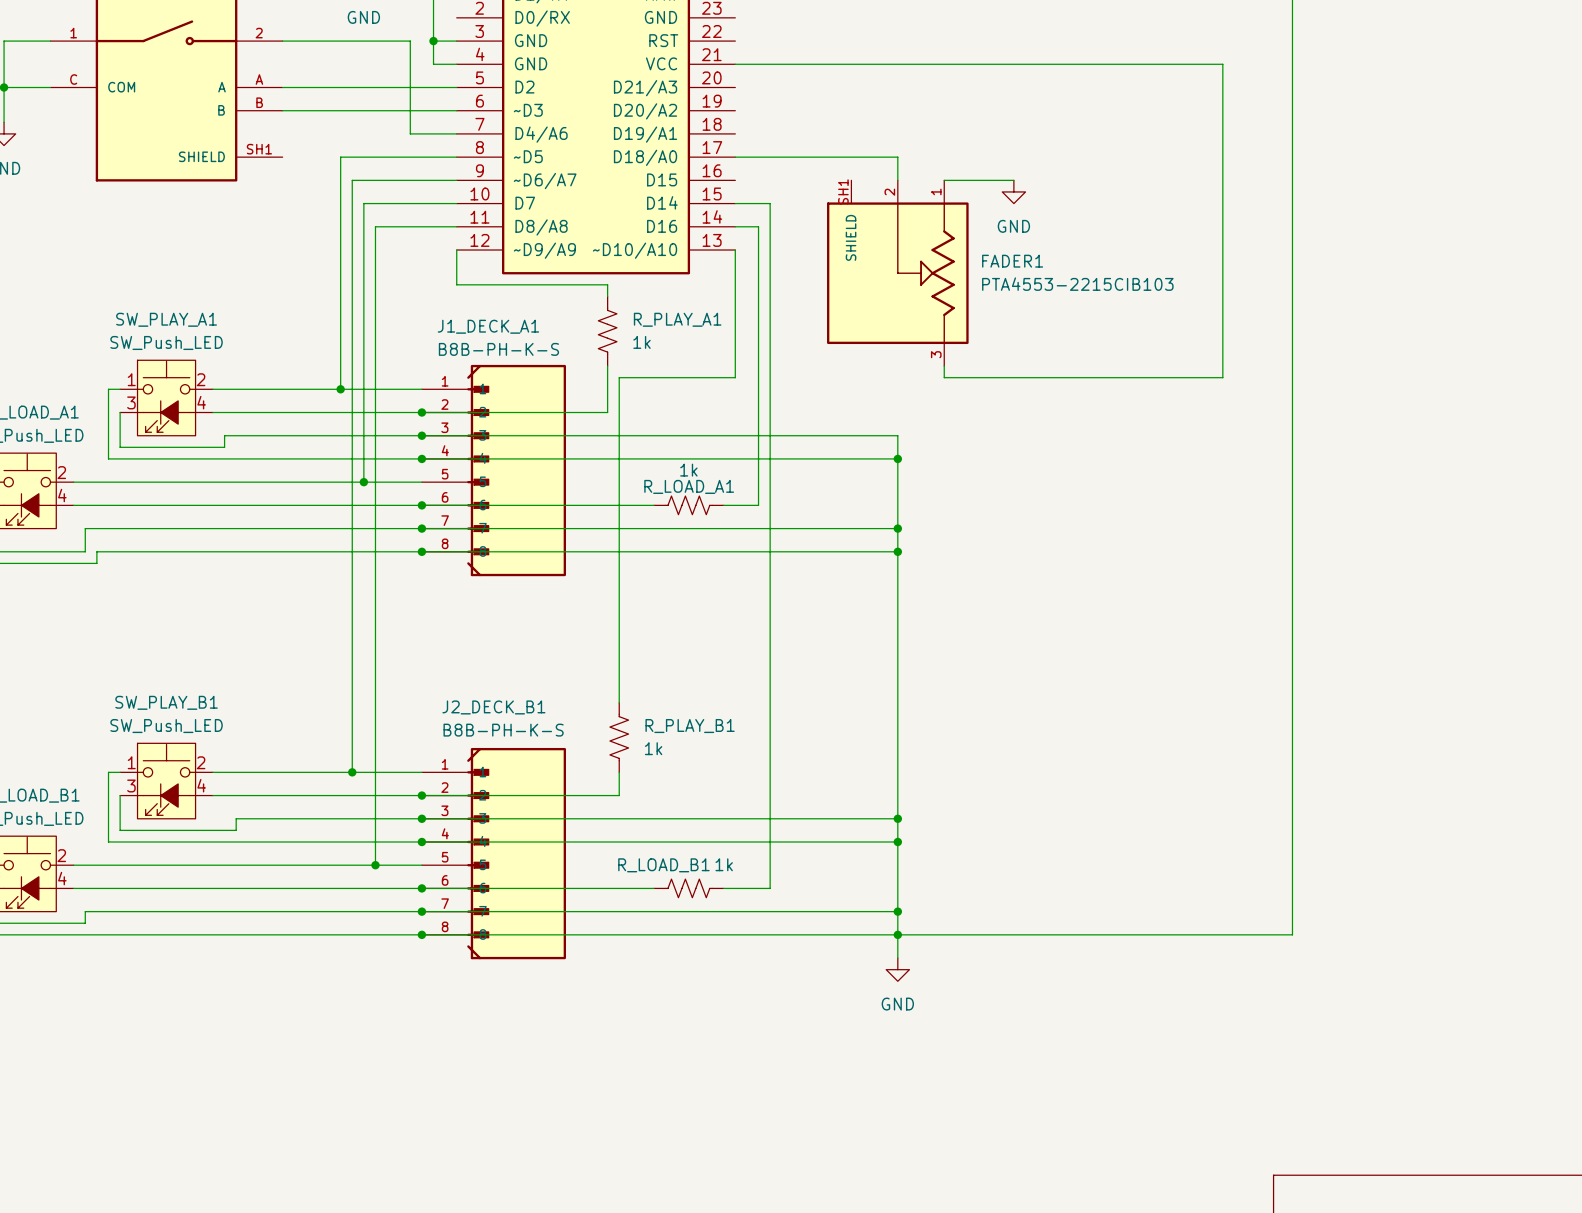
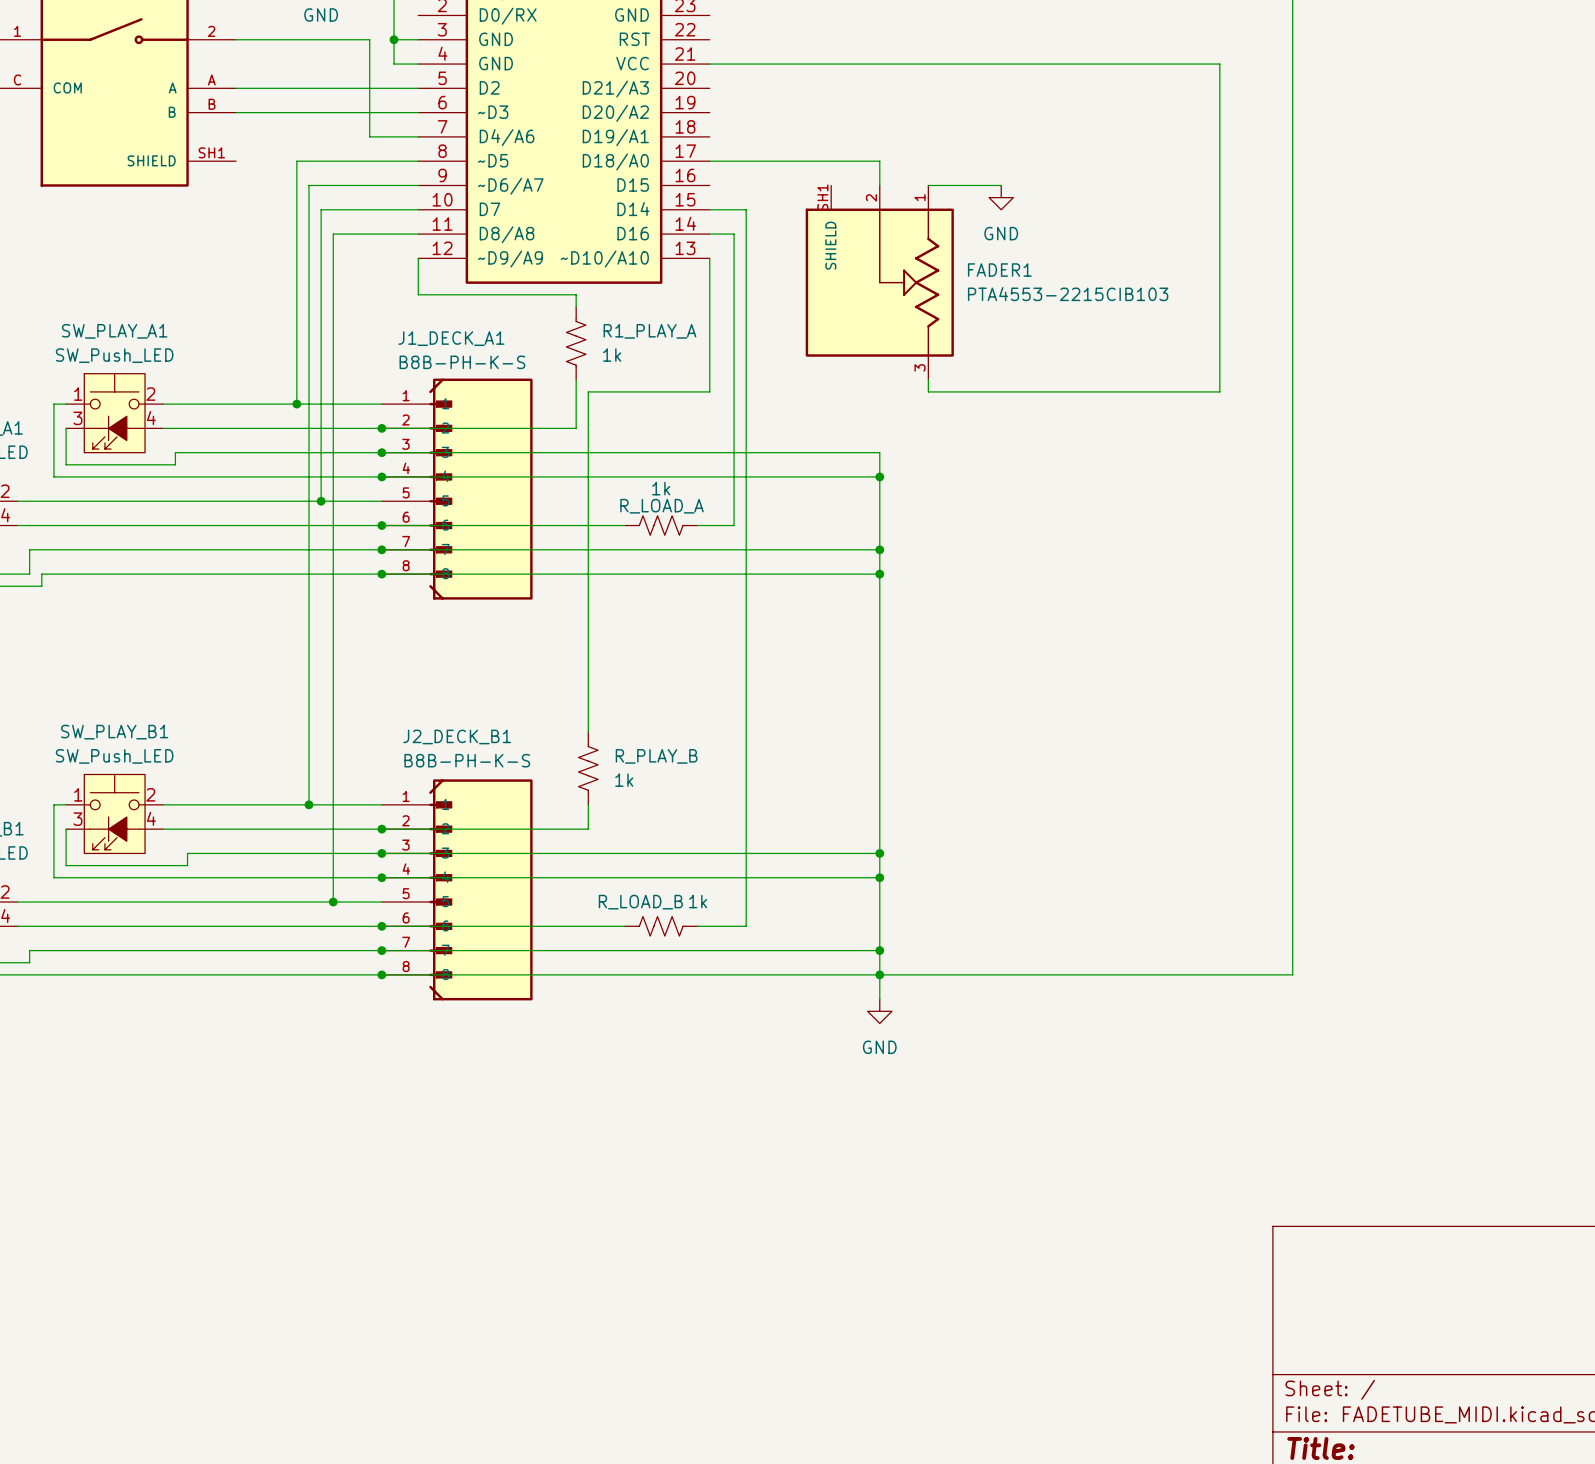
R_PLAY_A1 name: R_PLAY_A1 (677, 319) -> R1_PLAY_A (649, 331)
R_LOAD_A1 name: R_LOAD_A1 (689, 486) -> R_LOAD_A (662, 506)
R_PLAY_B1 name: R_PLAY_B1 (690, 726) -> R_PLAY_B (656, 756)
R_LOAD_B1 name: R_LOAD_B1 (663, 865) -> R_LOAD_B (640, 902)

